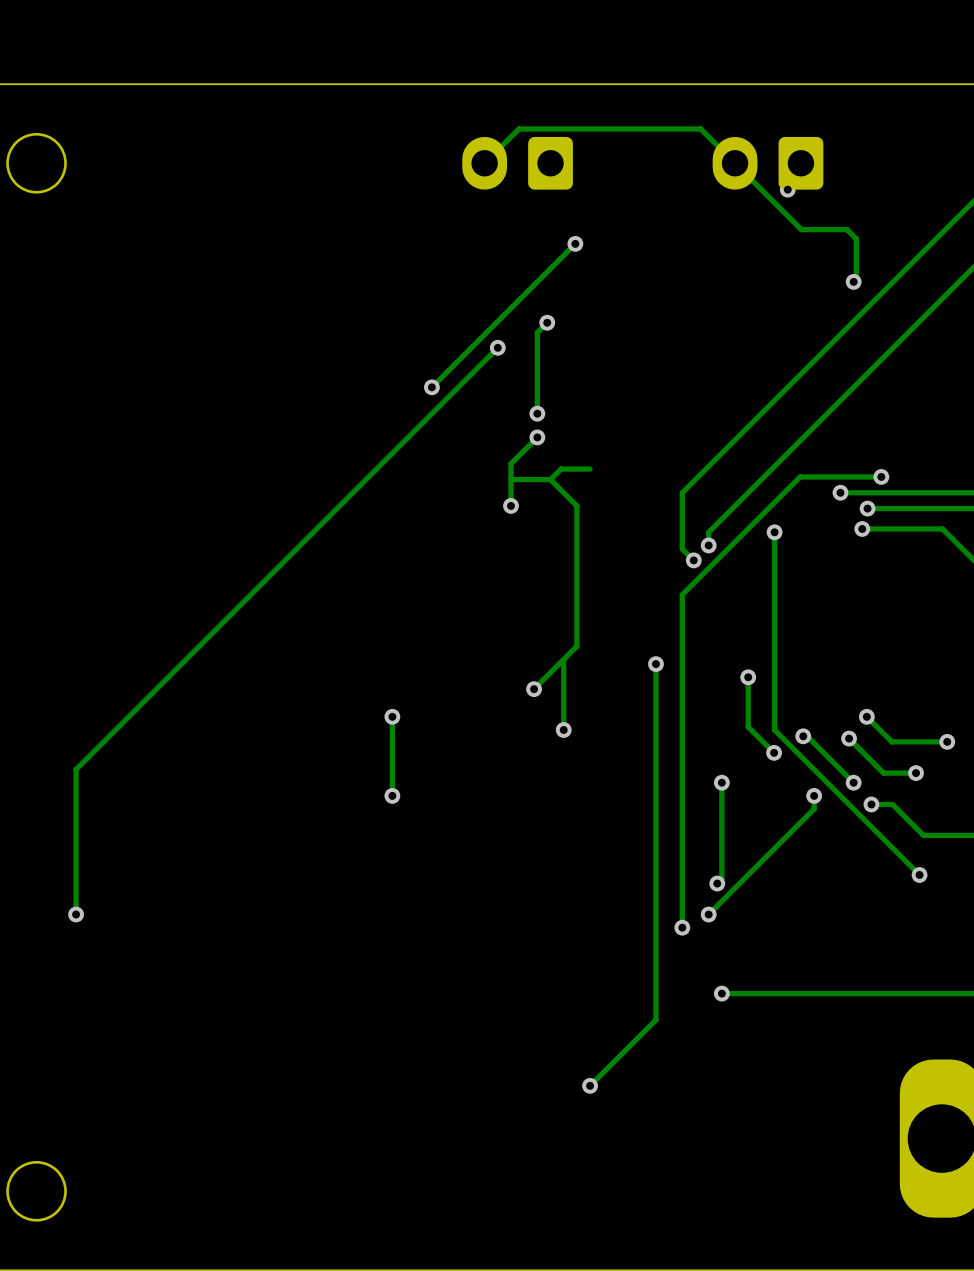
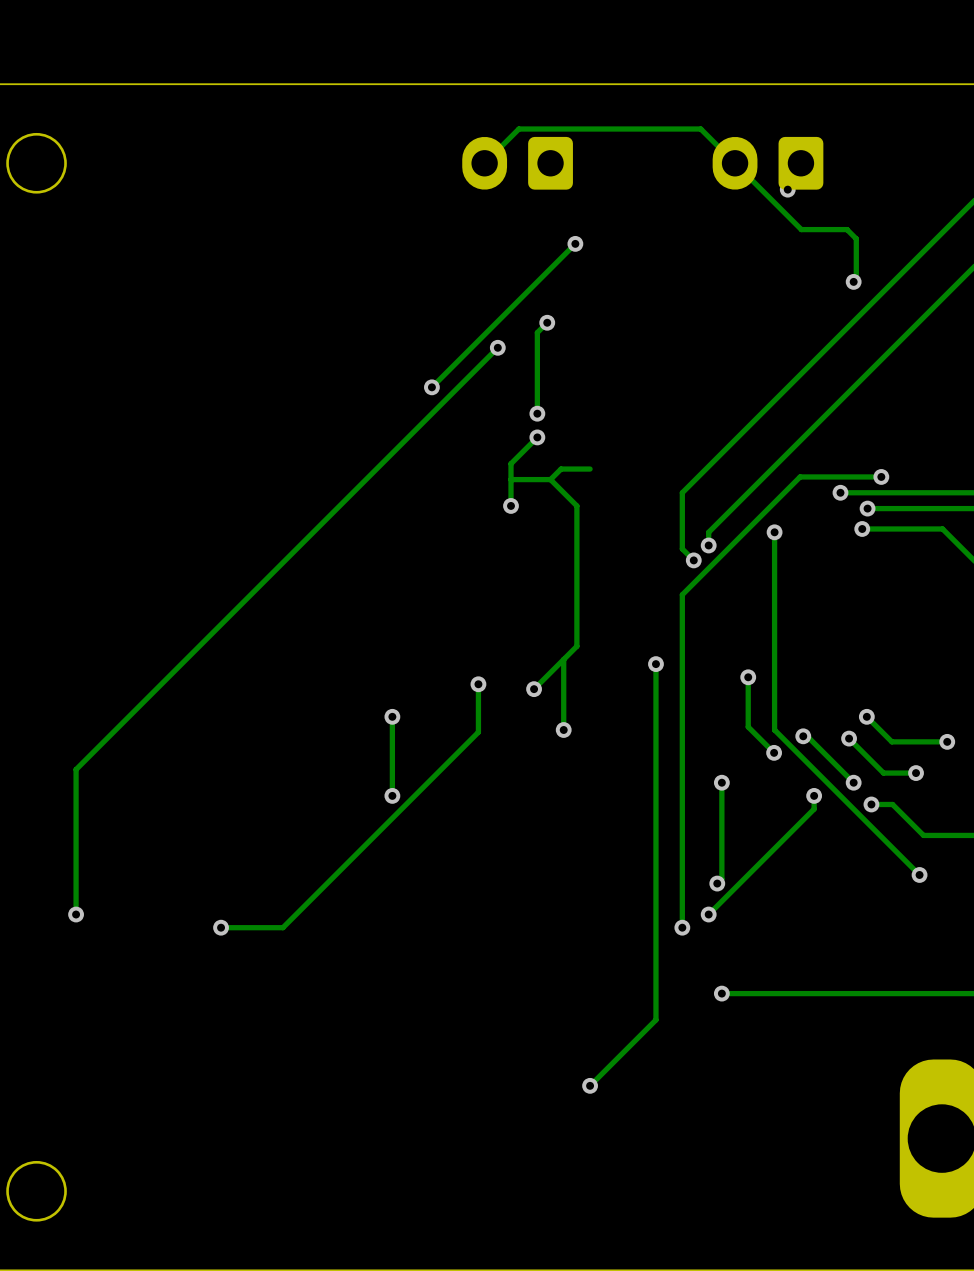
track: none -> (478, 684) (478, 732) (282, 927) (221, 927)
via: none -> (478, 684)
via: none -> (221, 927)

